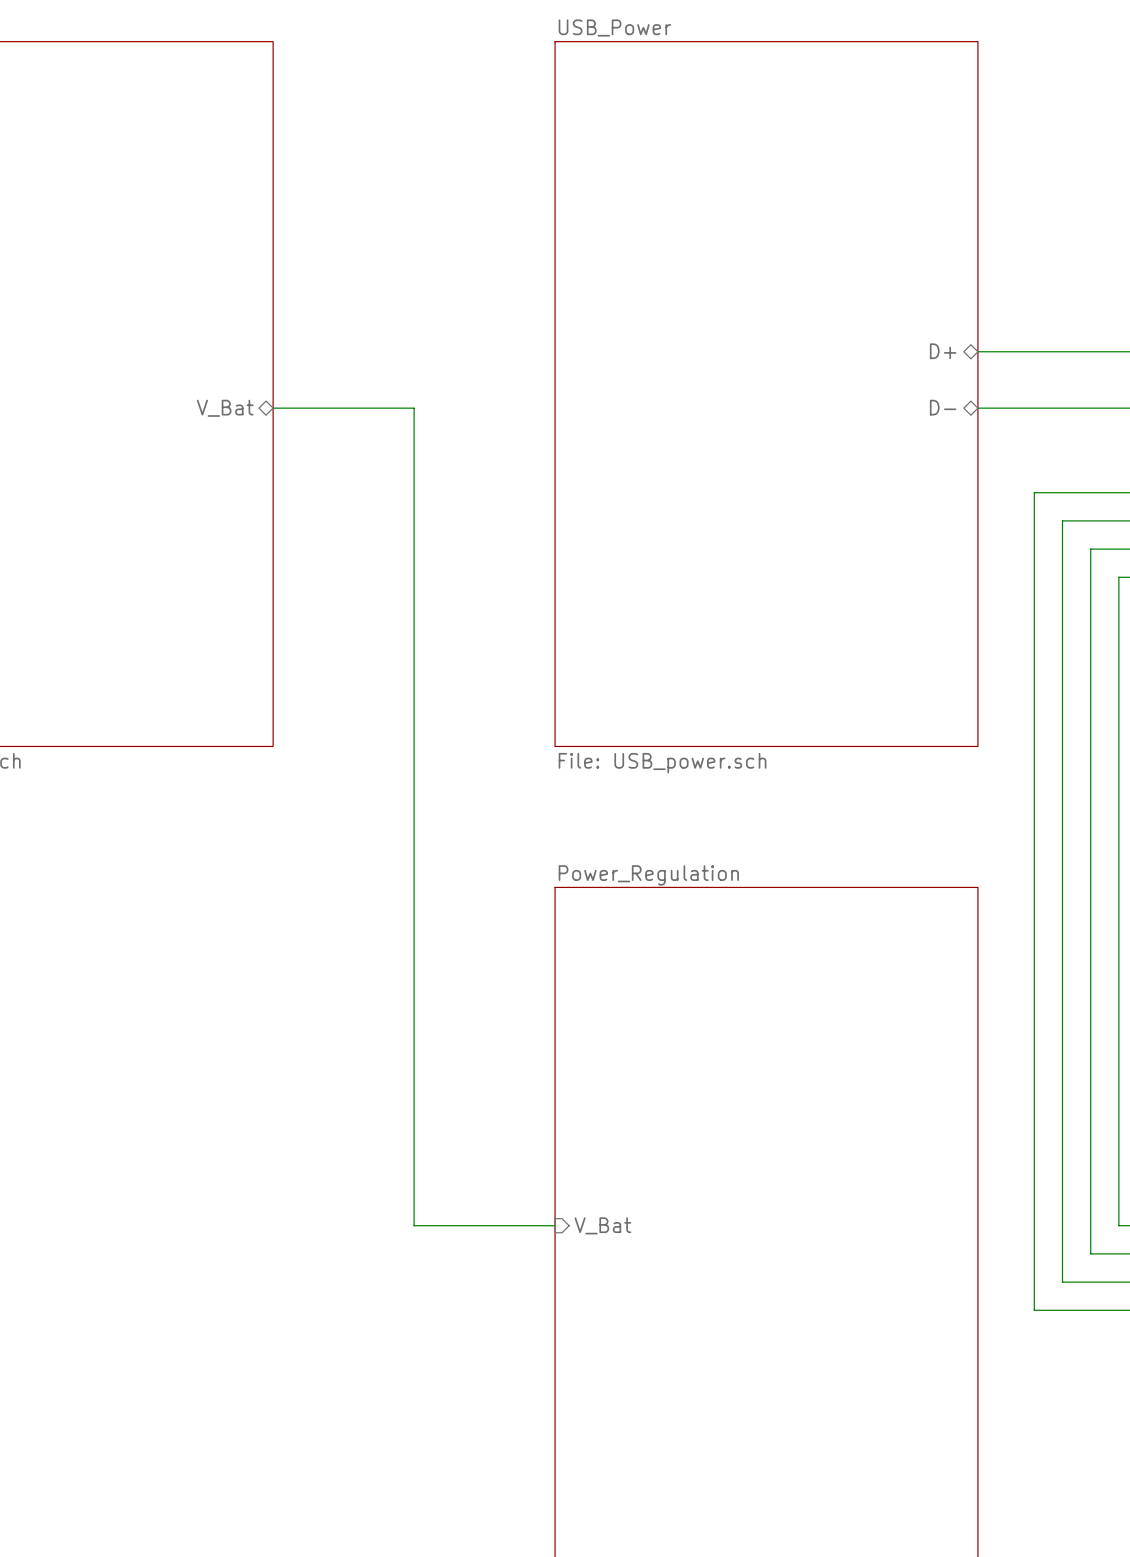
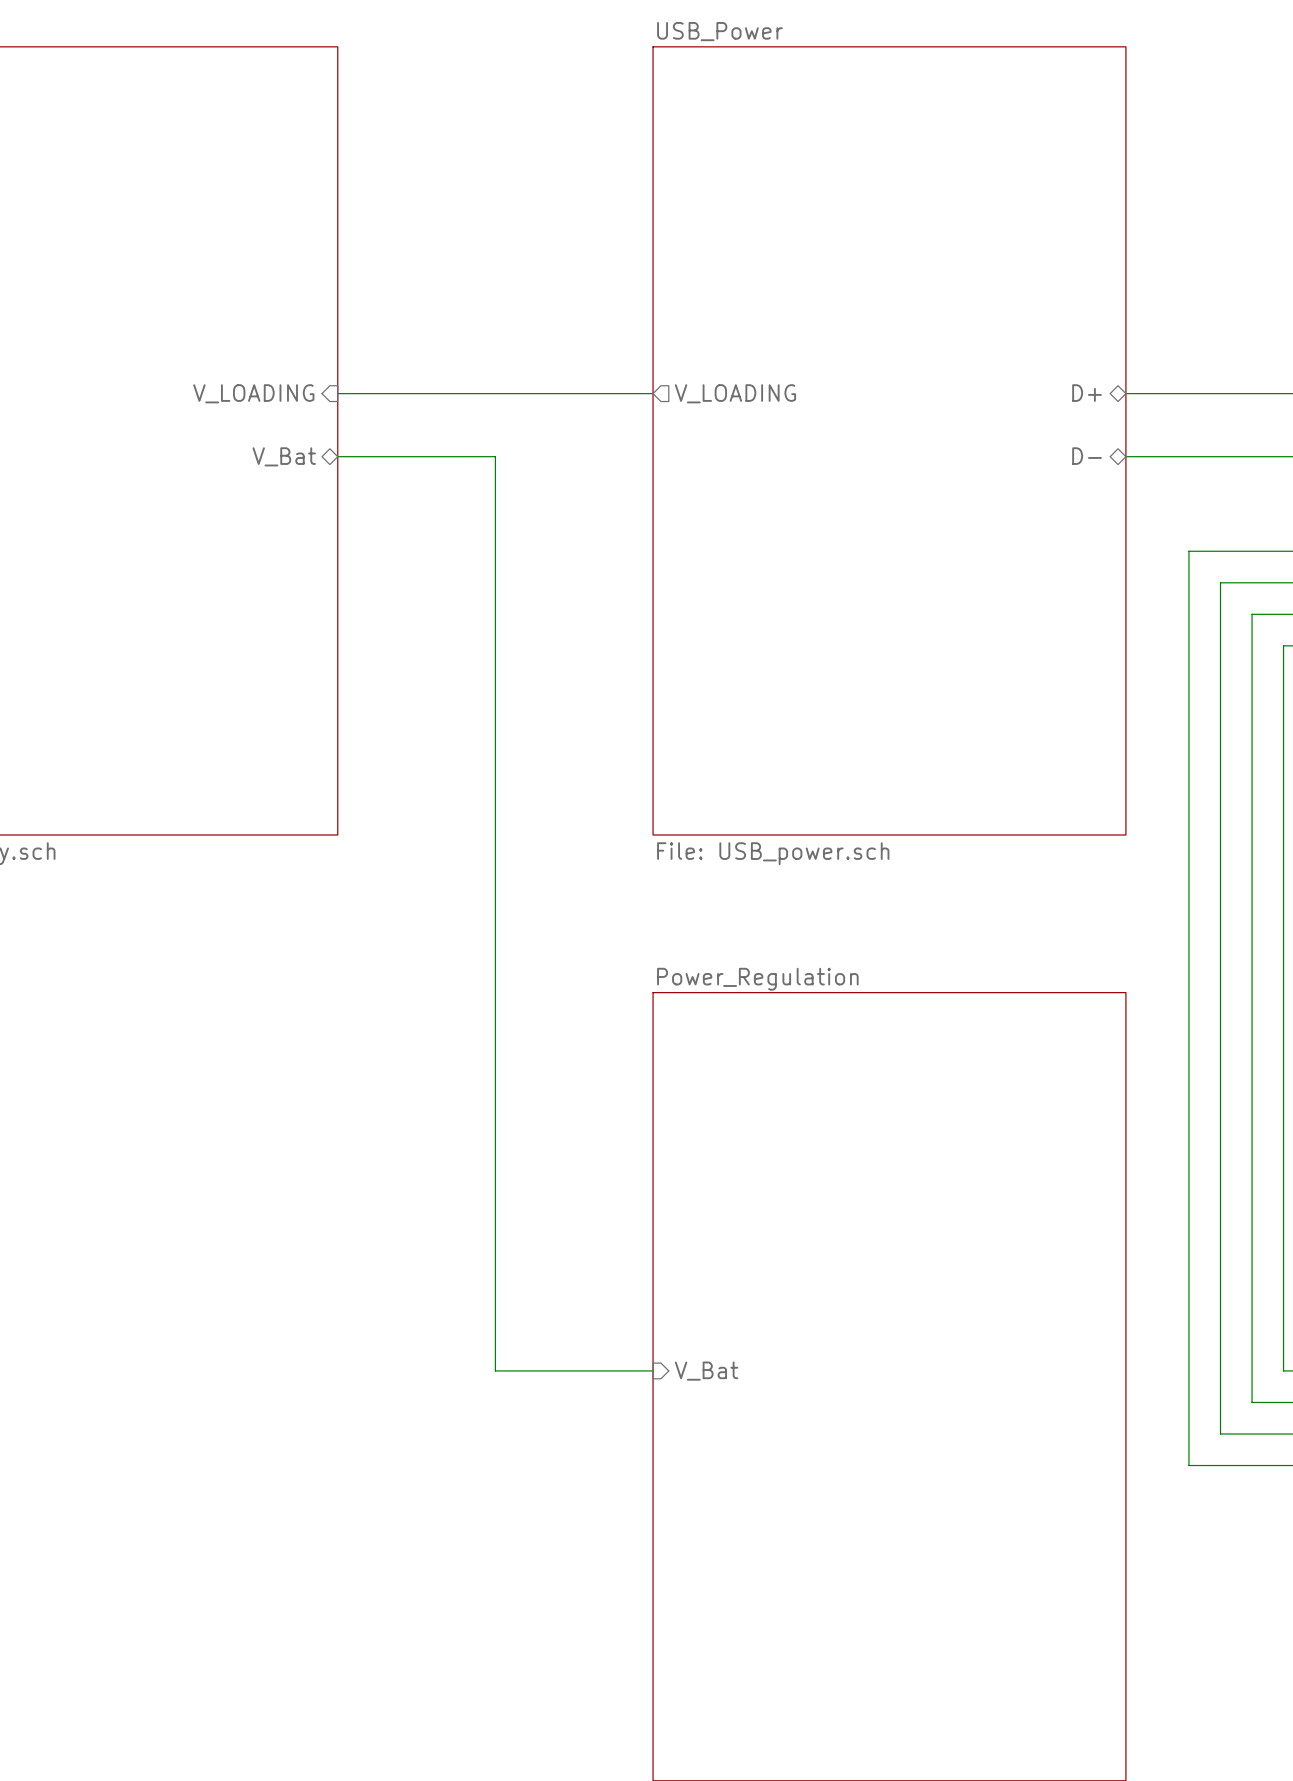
sheet pin: none -> V_LOADING (253, 393)
wire: none -> (337, 393) (653, 393)
sheet pin: none -> V_LOADING (735, 393)

